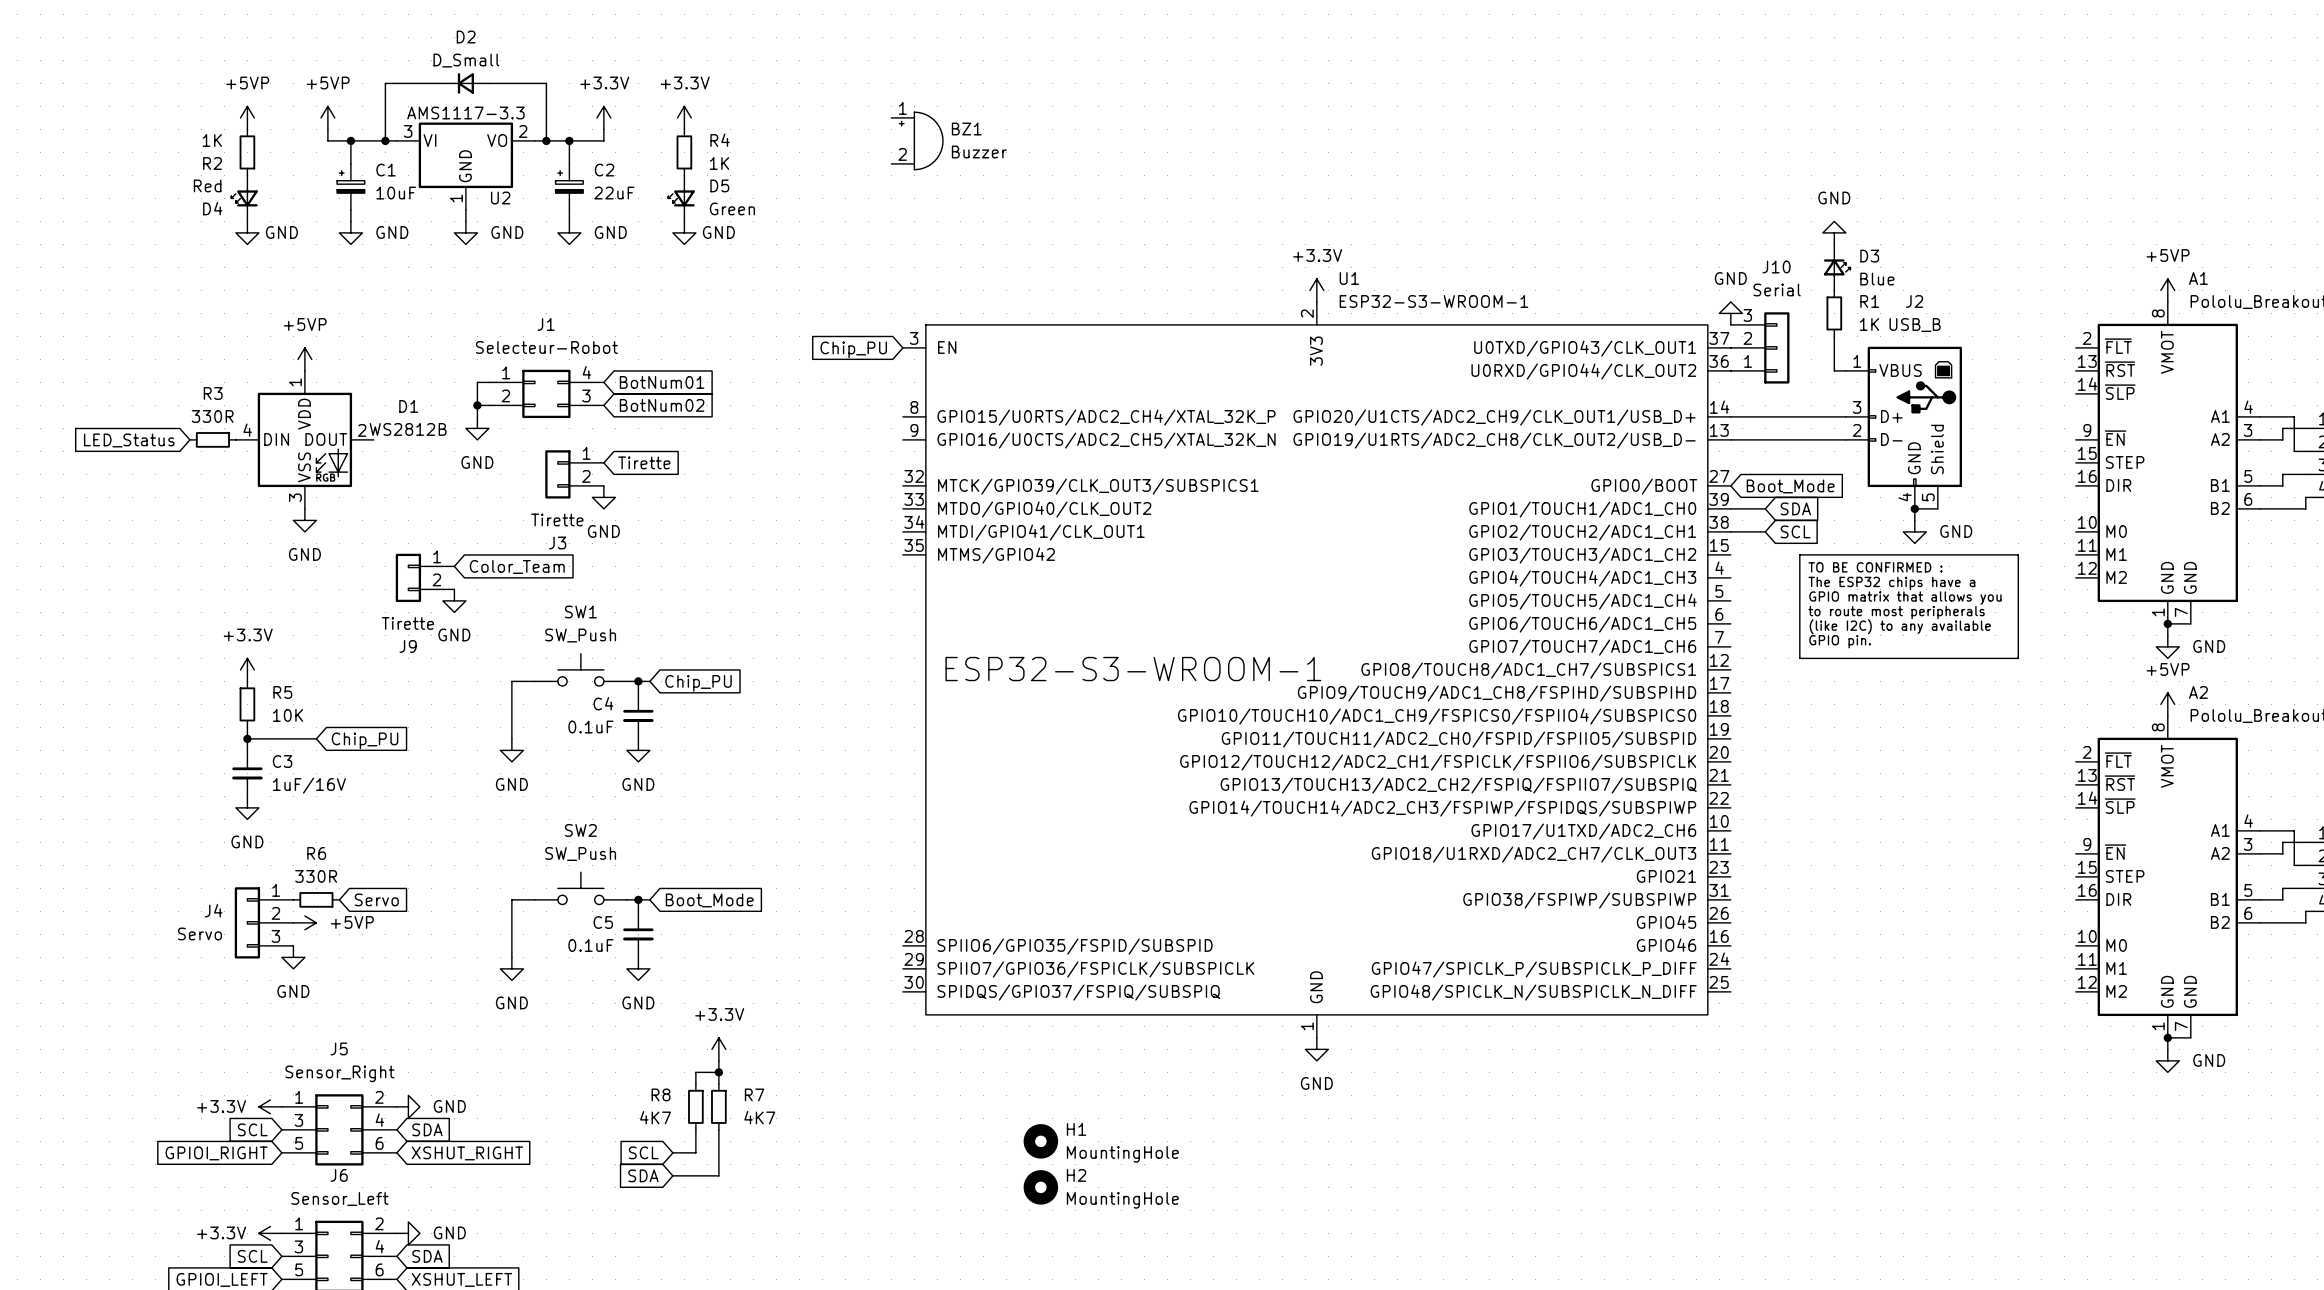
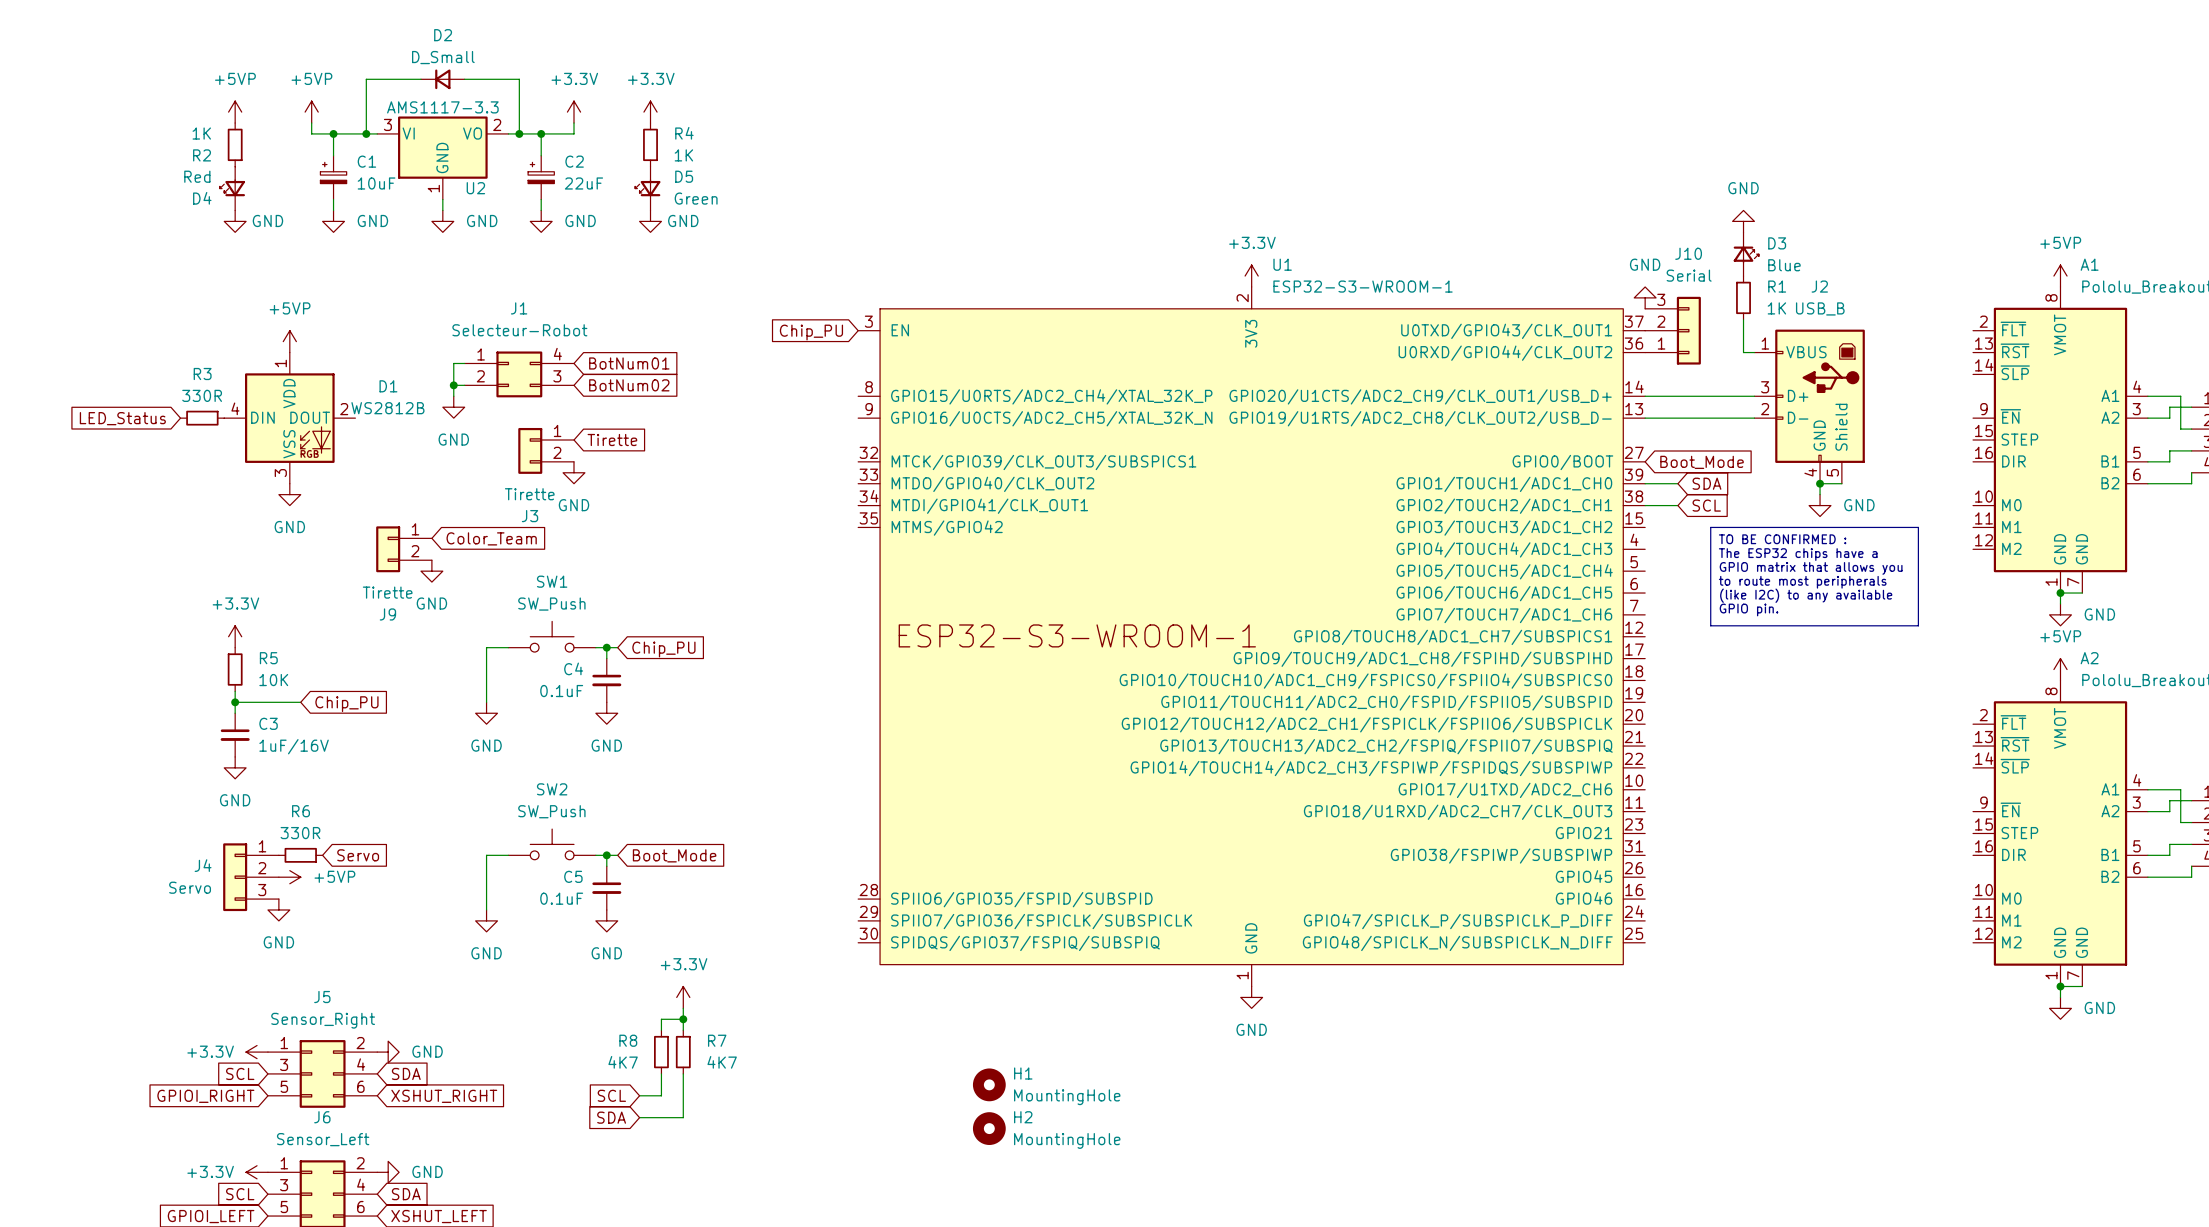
BZ1: Buzzer (917, 140) -> none

